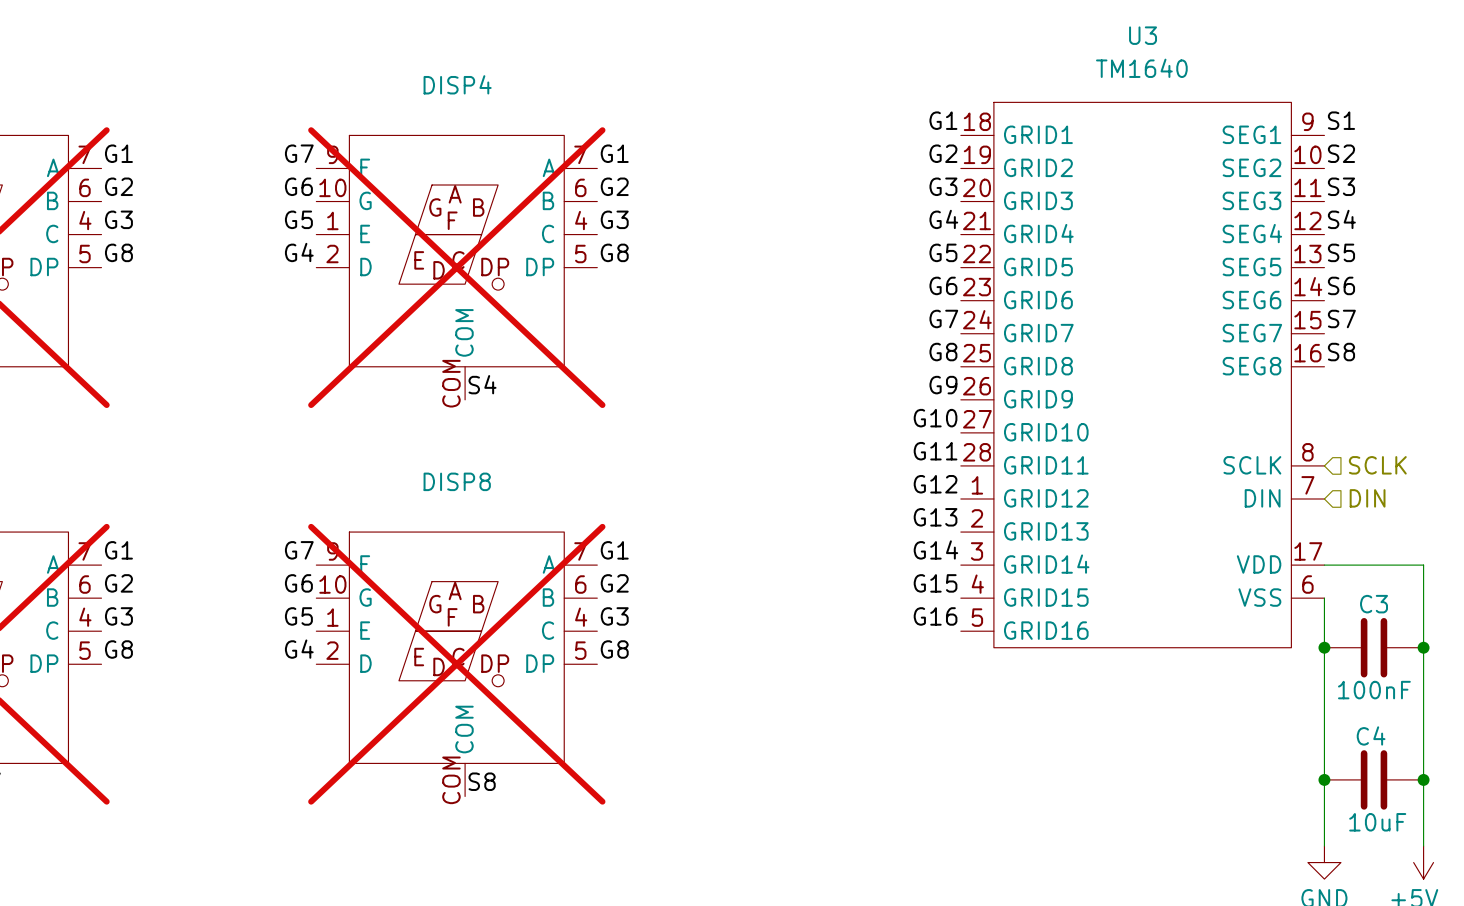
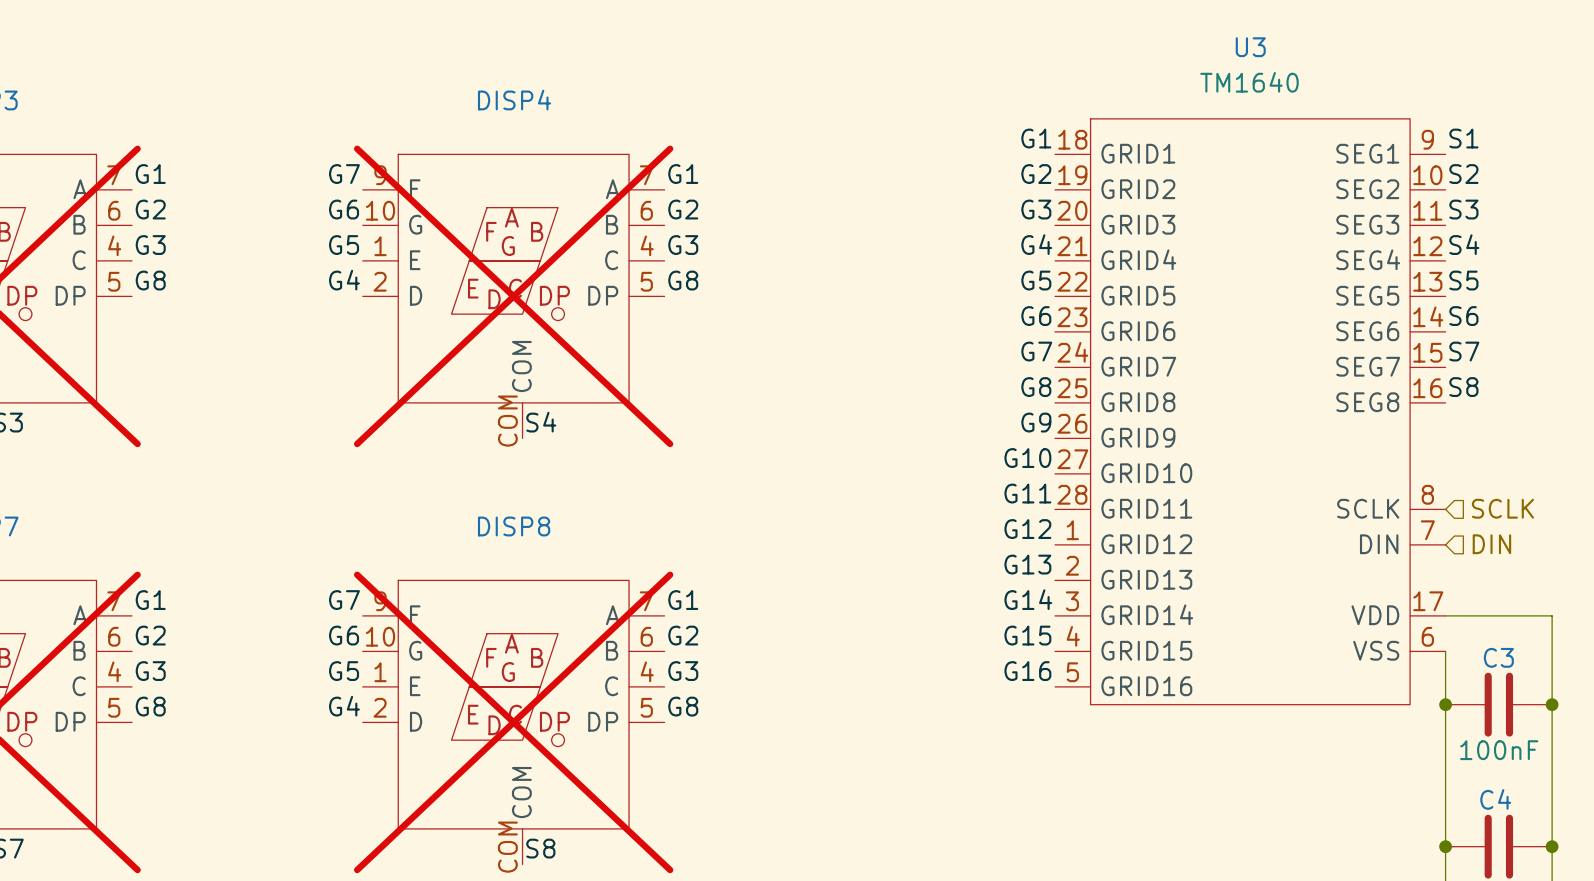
DISP4 text: G (435, 207) -> F (491, 231)
DISP4 text: F (452, 220) -> G (508, 246)
DISP8 text: G (435, 604) -> F (491, 657)
DISP8 text: F (452, 617) -> G (508, 672)

